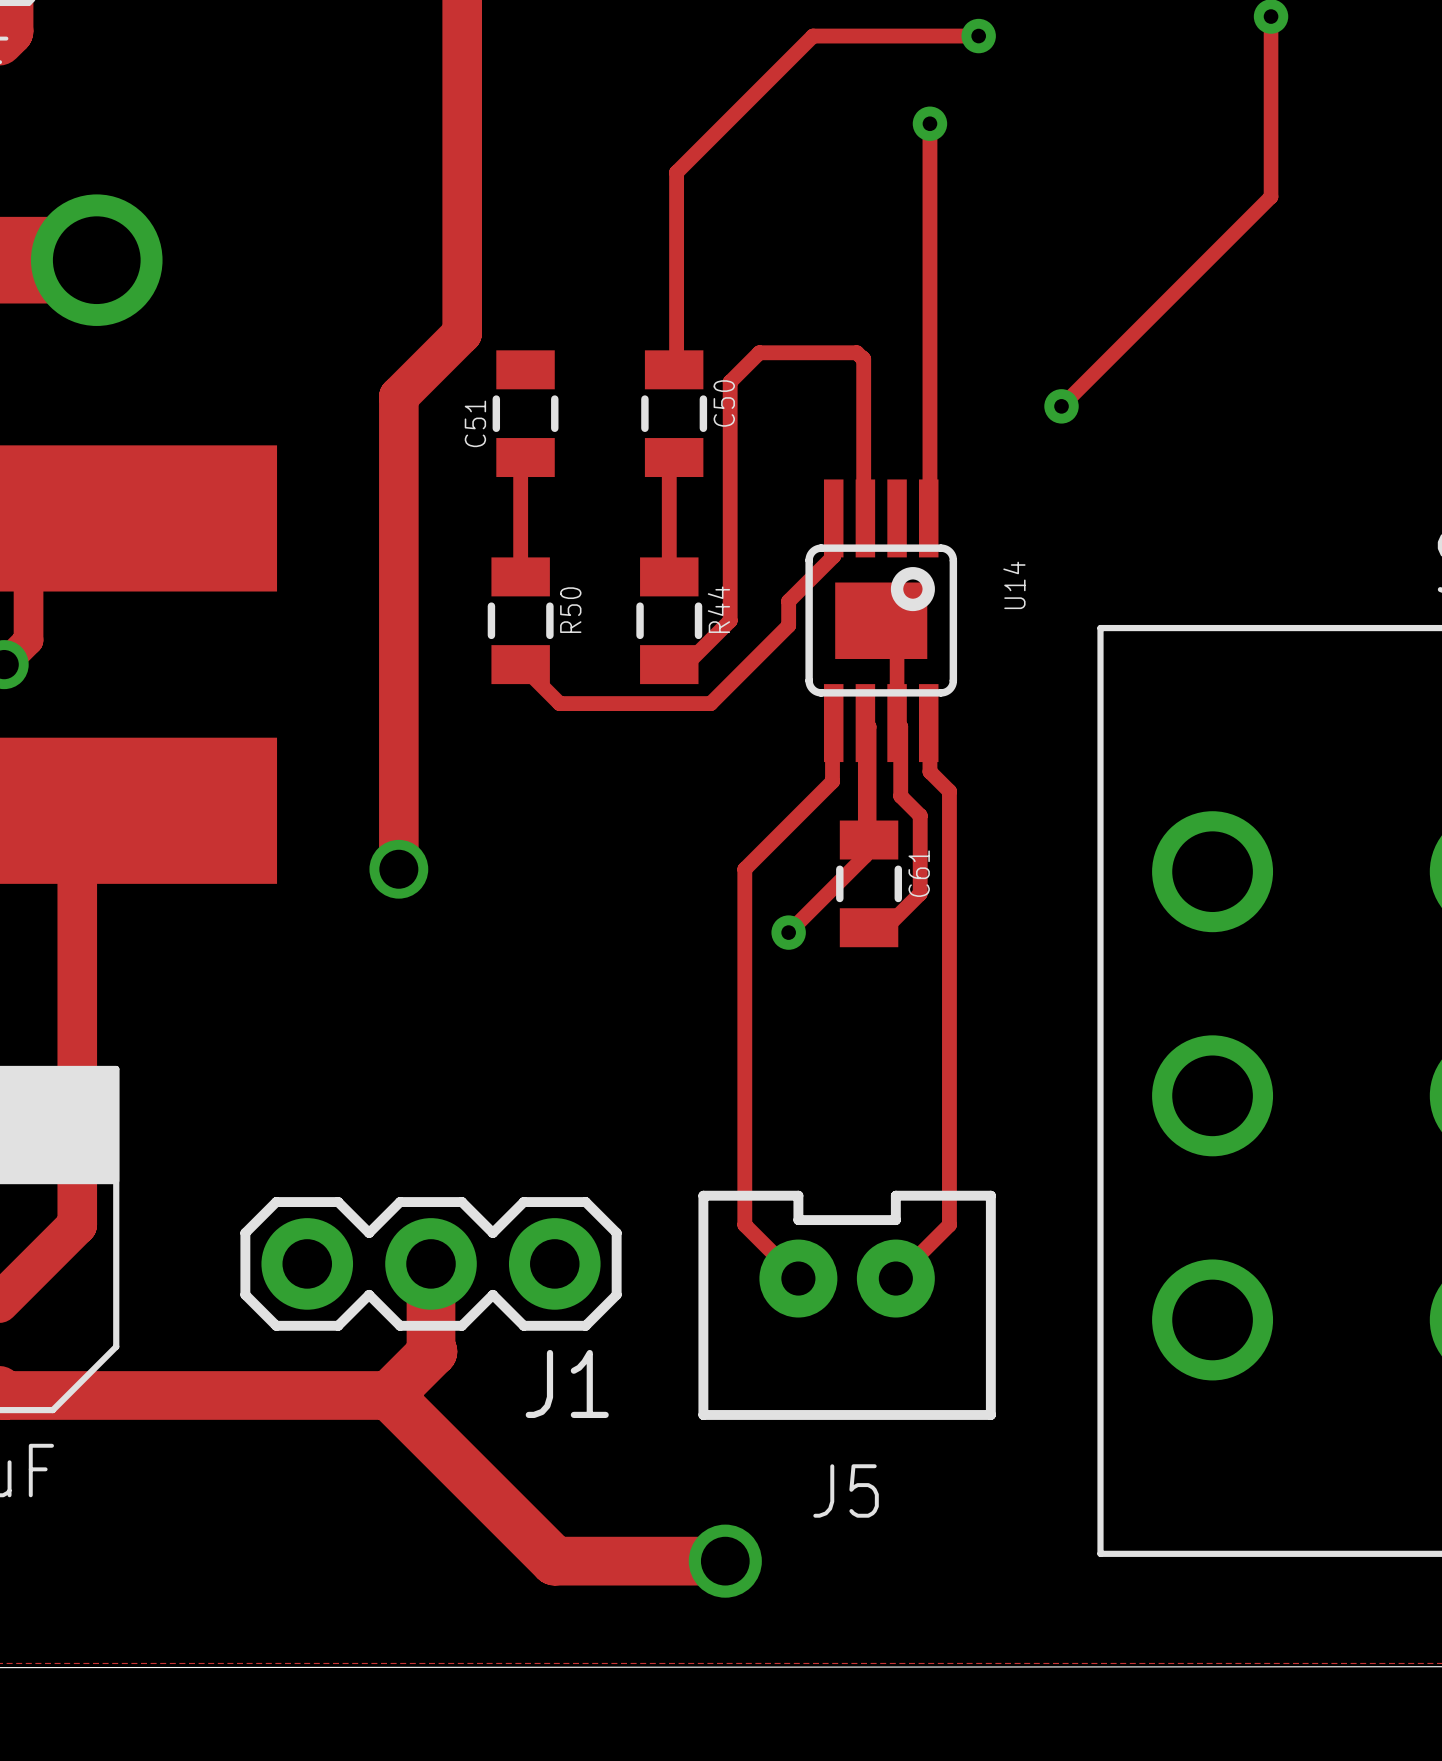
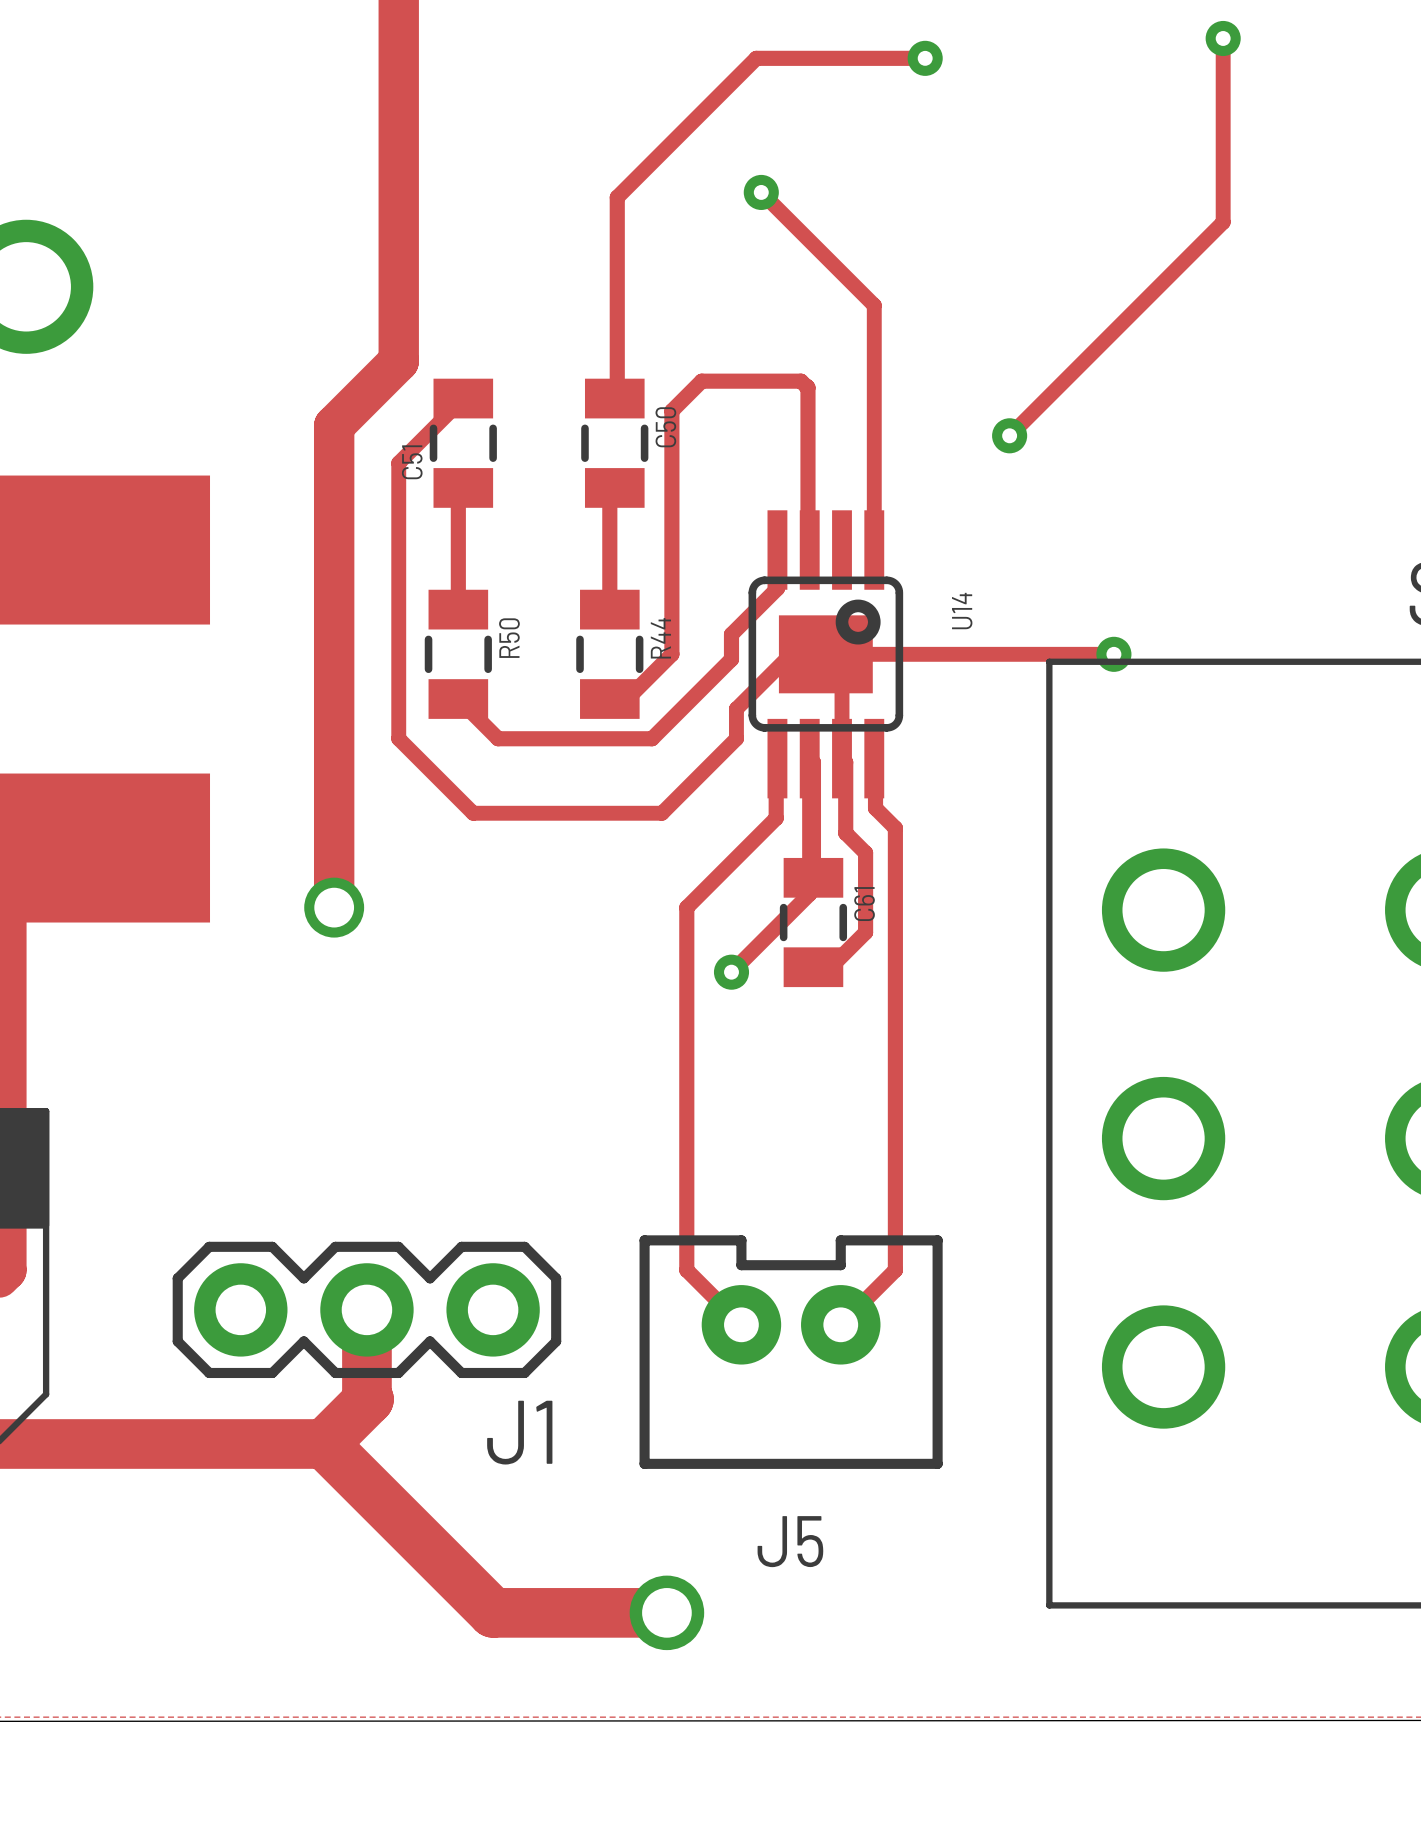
track: (929, 123) (928, 518) -> (761, 192) (874, 305) (874, 550)
via position: (929, 123) -> (761, 192)
track: none -> (463, 398) (398, 463) (398, 738) (473, 813) (661, 813) (736, 738) (736, 708) (791, 654) (1113, 654)
via: none -> (1113, 654)

